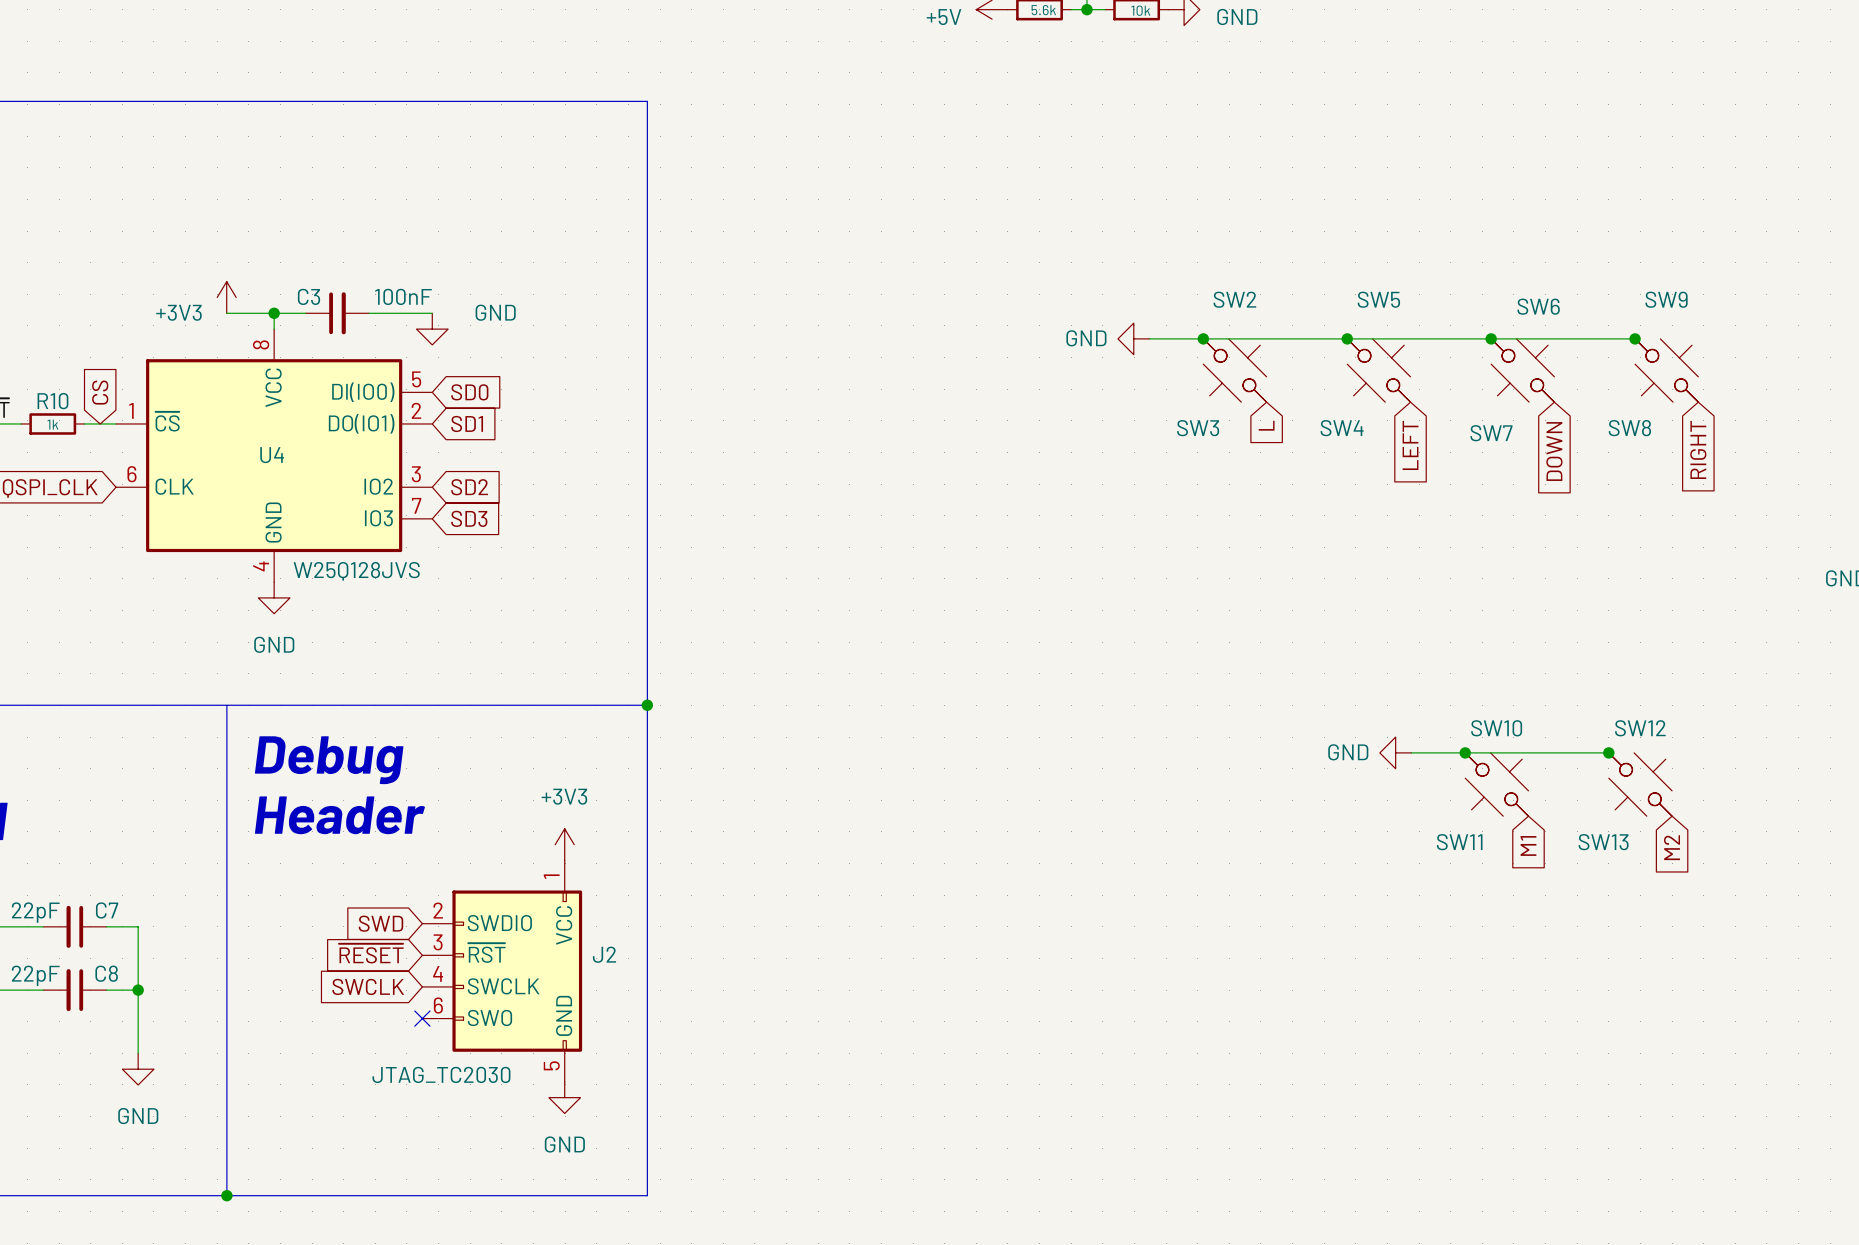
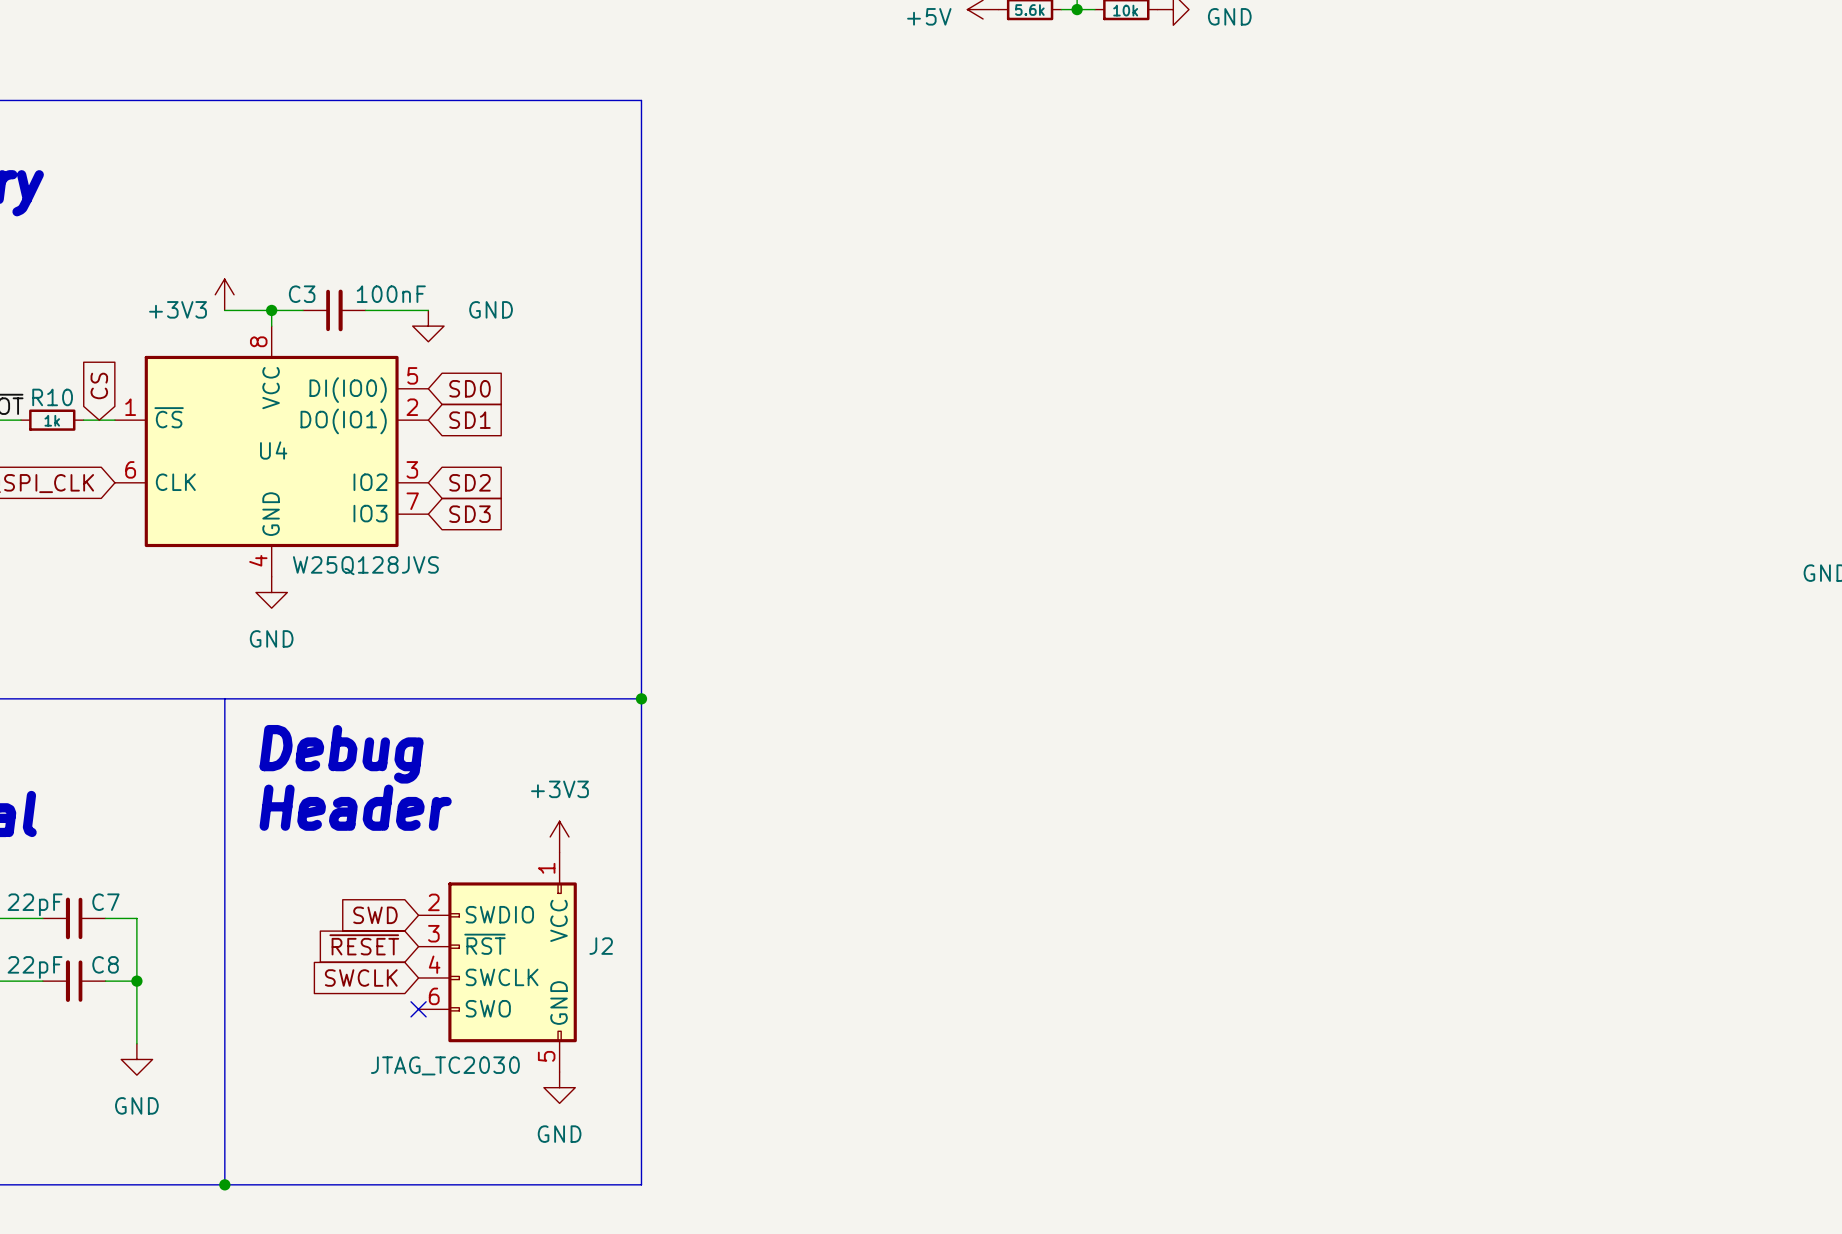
power symbol: GND (1133, 338) -> none
wire: (1149, 338) (1635, 338) -> none
junction: (1203, 338) -> none
junction: (1347, 338) -> none
junction: (1491, 338) -> none
junction: (1635, 338) -> none
SW2: (1234, 370) -> none
SW3: (1234, 370) -> none
SW4: (1378, 370) -> none
SW5: (1378, 370) -> none
SW6: (1522, 370) -> none
SW7: (1522, 370) -> none
SW8: (1666, 370) -> none
SW9: (1666, 370) -> none
global label: L (1266, 425) -> none
global label: LEFT (1410, 445) -> none
global label: RIGHT (1698, 449) -> none
global label: DOWN (1554, 451) -> none
power symbol: GND (1395, 752) -> none
wire: (1411, 752) (1608, 752) -> none
junction: (1465, 752) -> none
junction: (1608, 752) -> none
SW10: (1496, 784) -> none
SW11: (1496, 784) -> none
SW12: (1640, 784) -> none
SW13: (1640, 784) -> none
global label: M1 (1528, 845) -> none
global label: M2 (1671, 847) -> none

